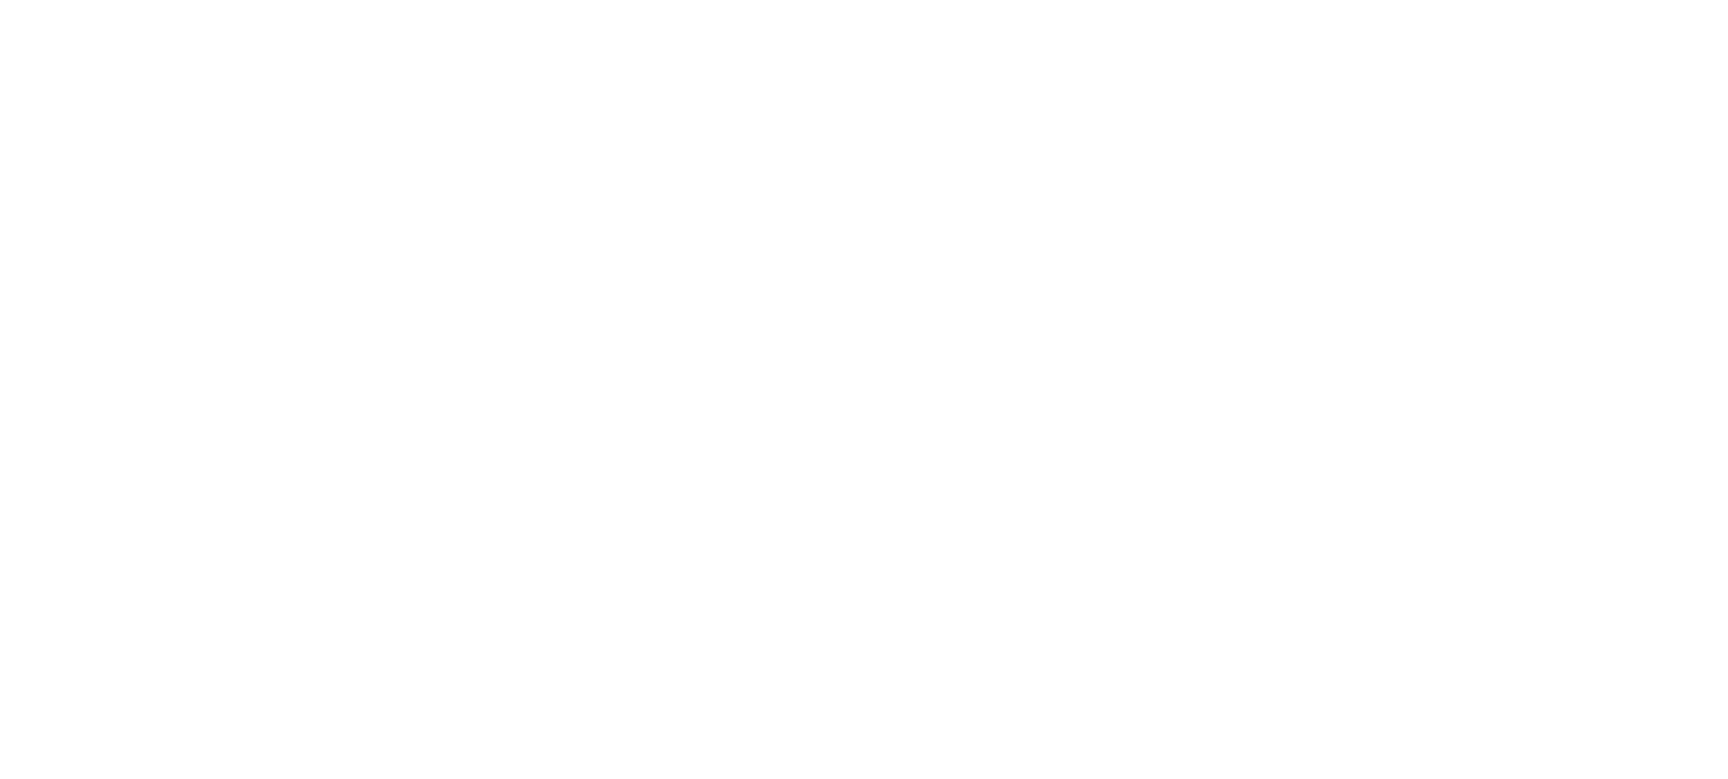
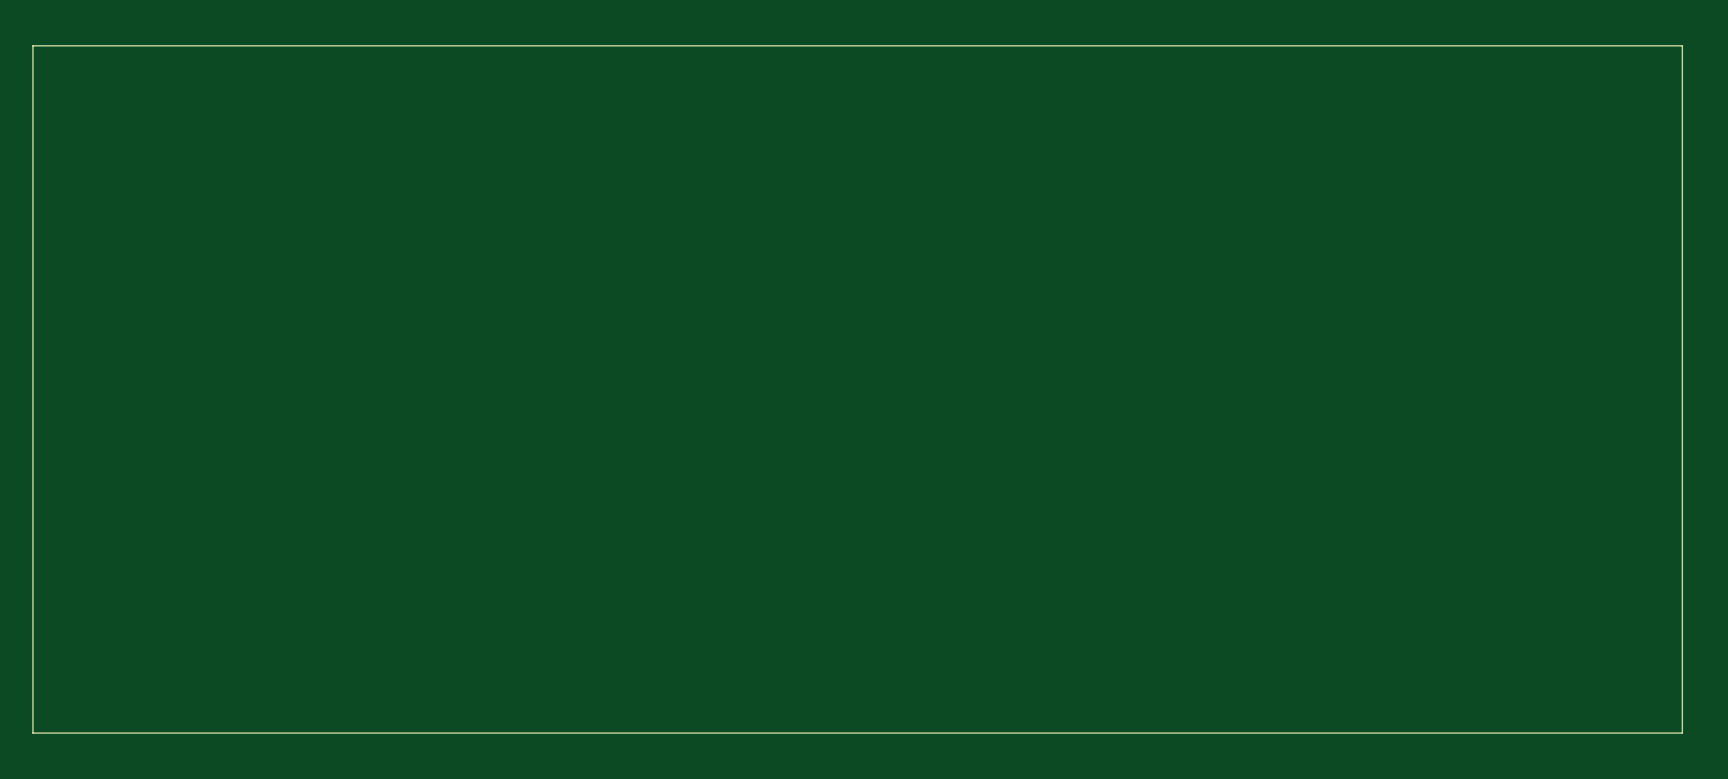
board edge: none -> (32, 45) (1682, 45) (1682, 733) (32, 733) (32, 45)

